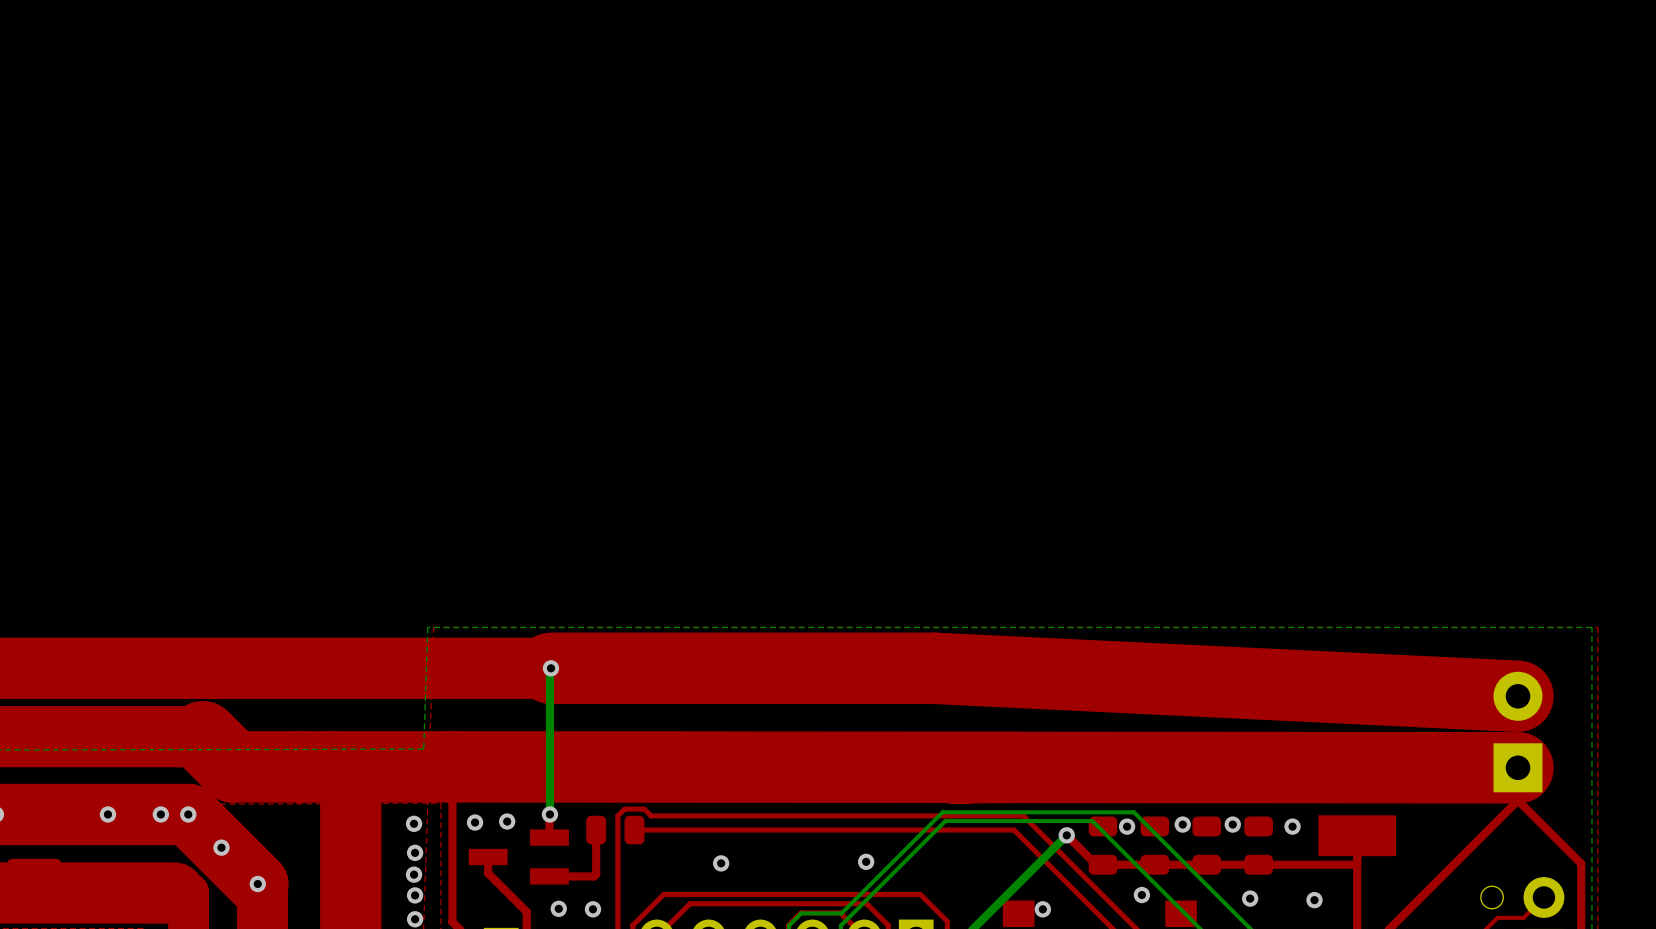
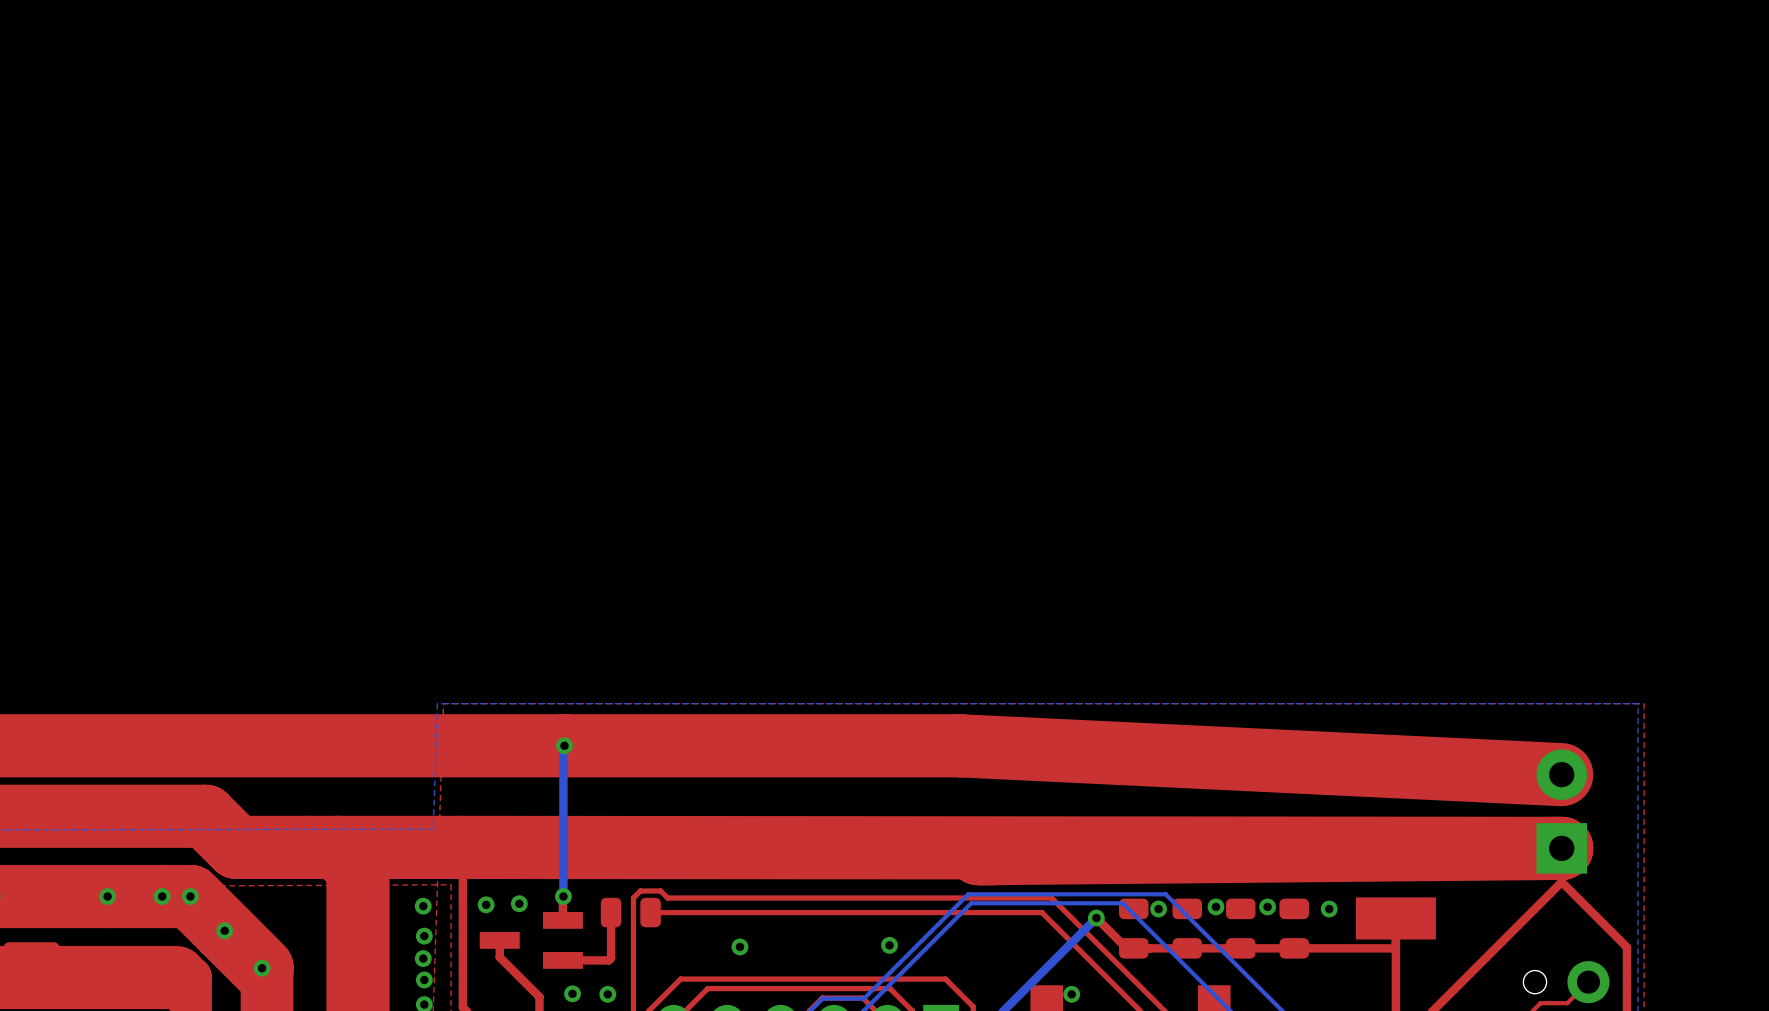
top track width: thick (551, 668) (934, 668) (1518, 696) -> thin (564, 745) (960, 745) (1561, 774)
top track width: thick (202, 736) (233, 766) (1518, 767) -> thin (205, 816) (236, 847) (1561, 848)
via: (1141, 895) -> none
via: (1250, 898) -> none
via: (1314, 900) -> none

